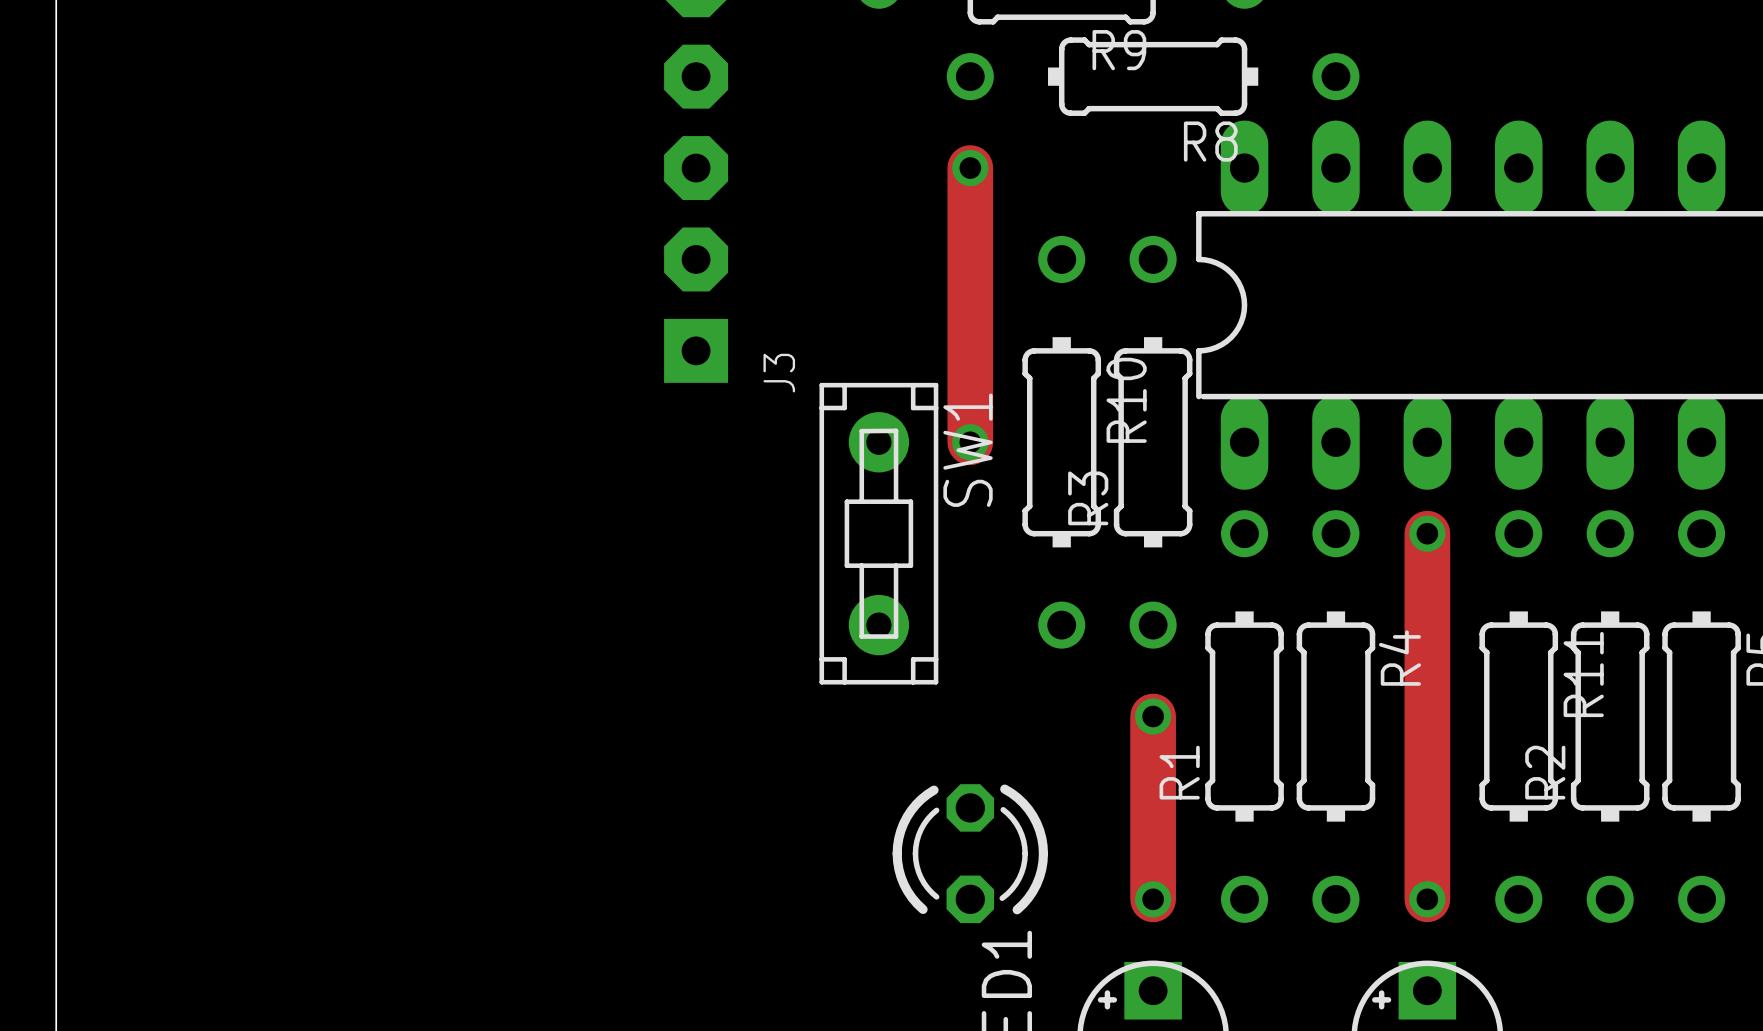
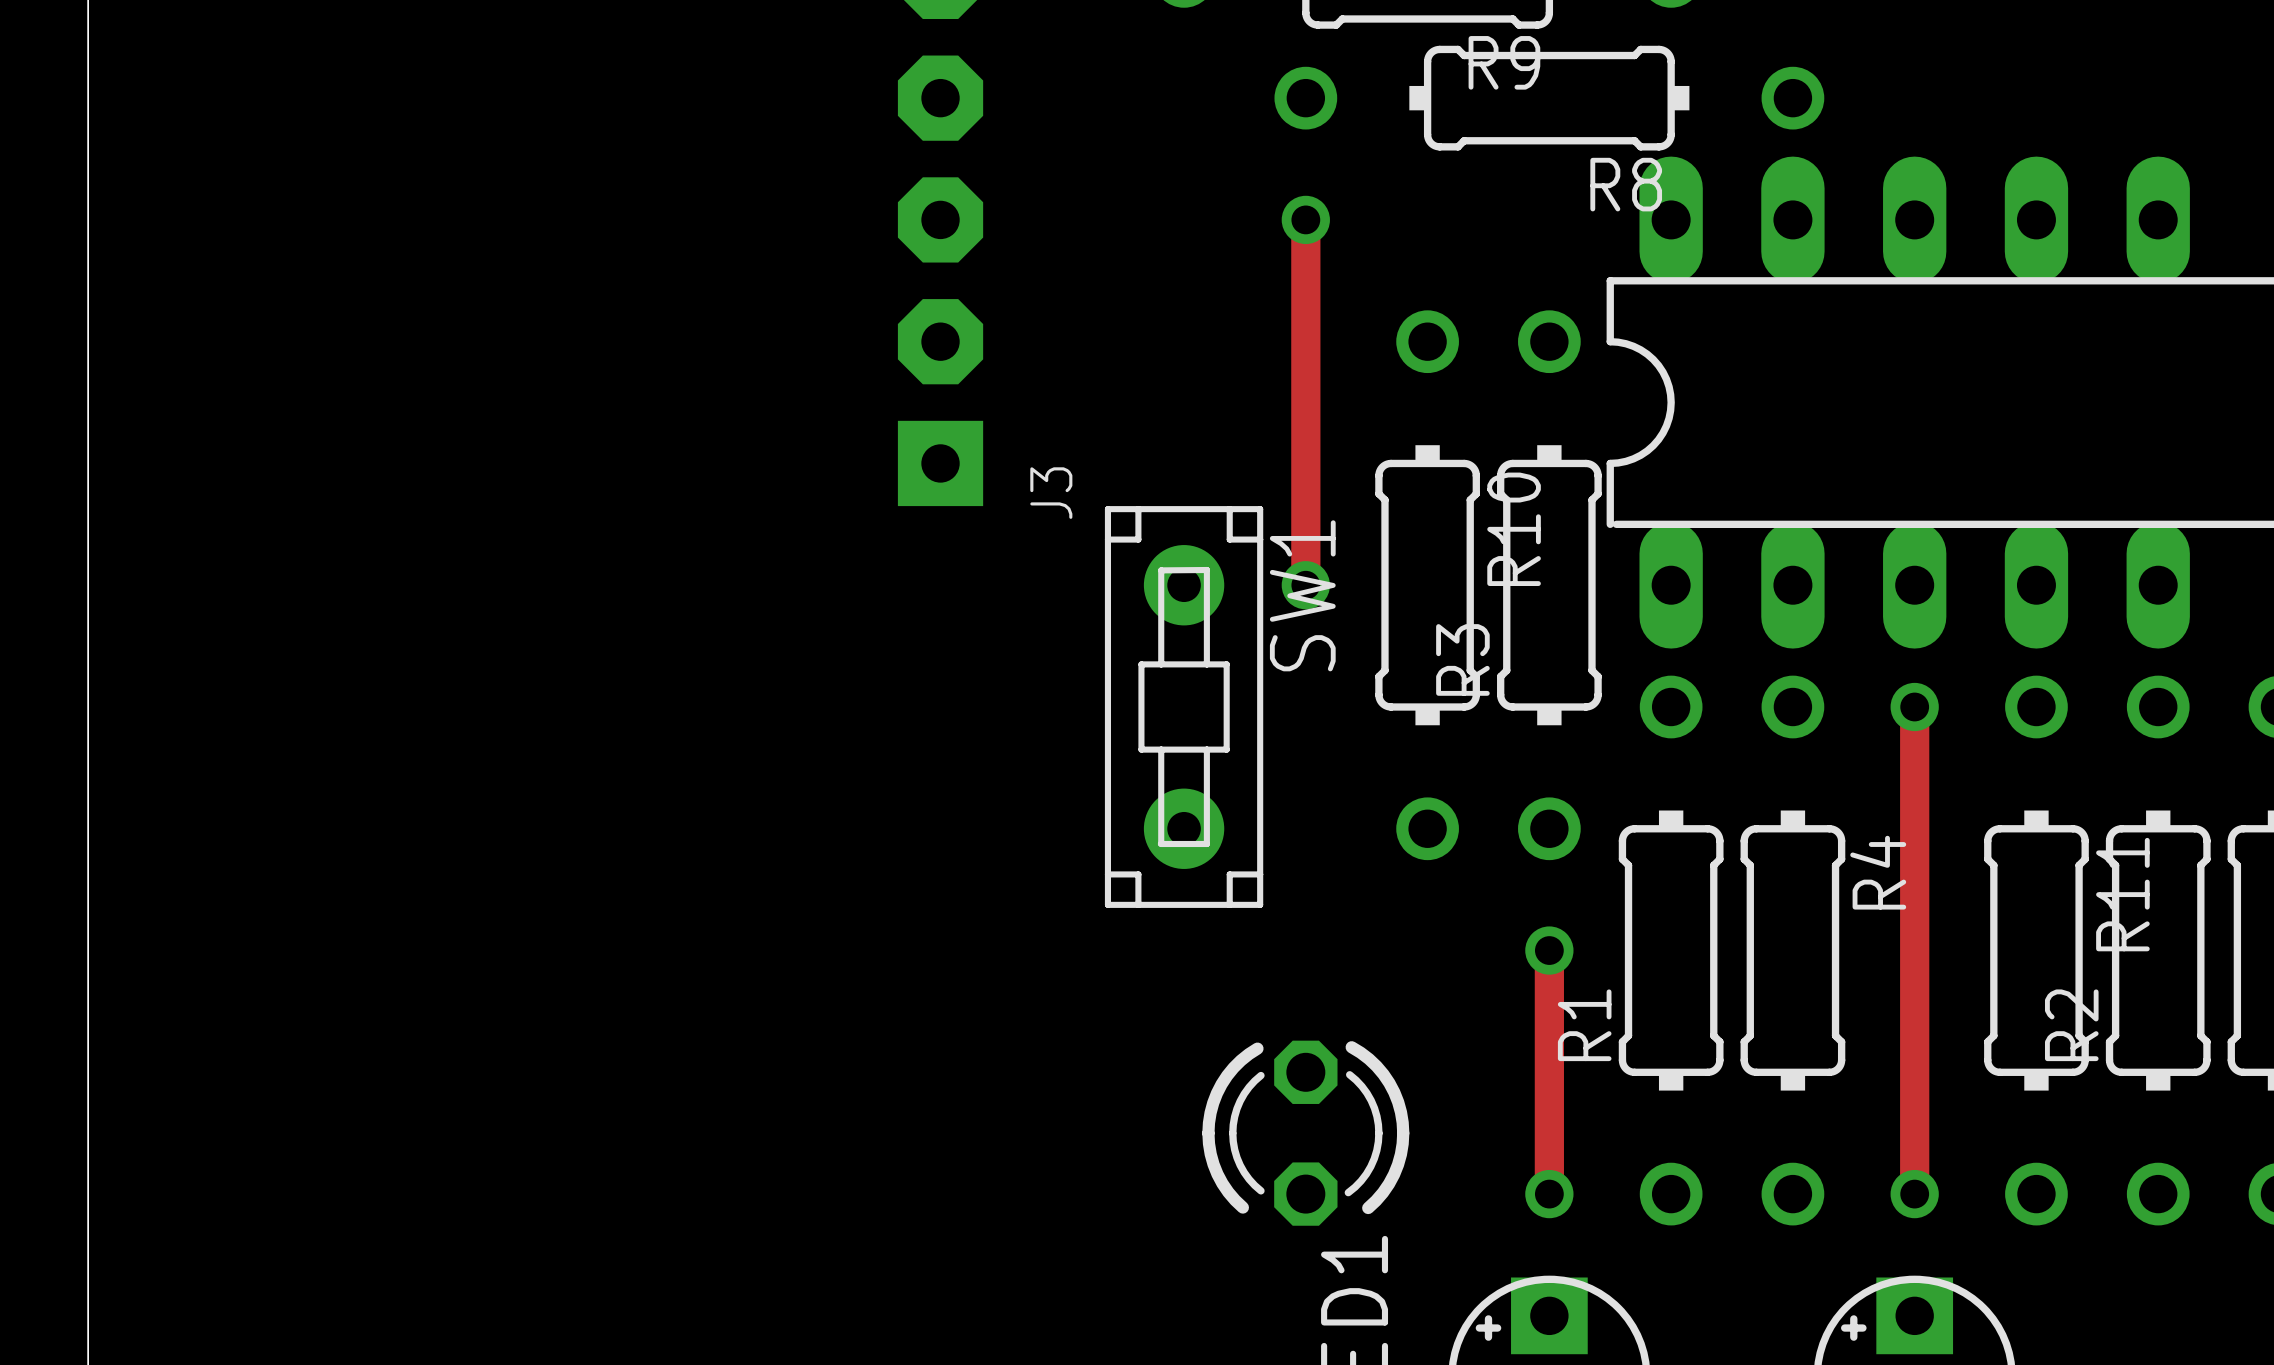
track width: thick (970, 168) (970, 442) -> thin (1305, 219) (1305, 585)
track width: thick (1427, 533) (1427, 899) -> thin (1914, 707) (1914, 1194)
track width: thick (1153, 716) (1153, 899) -> thin (1549, 950) (1549, 1194)

